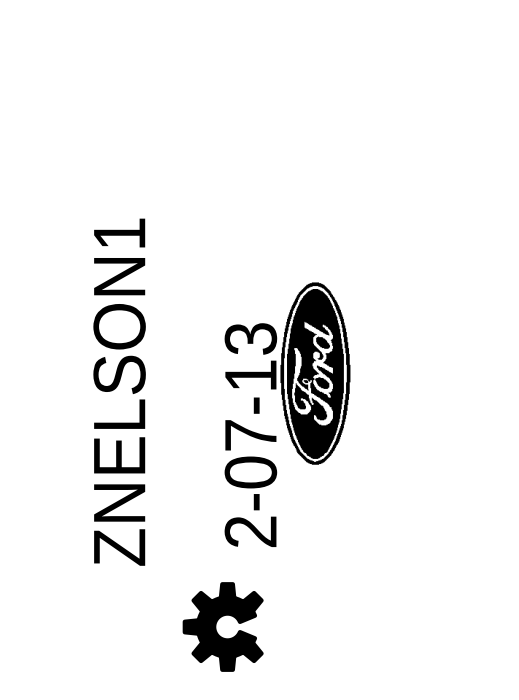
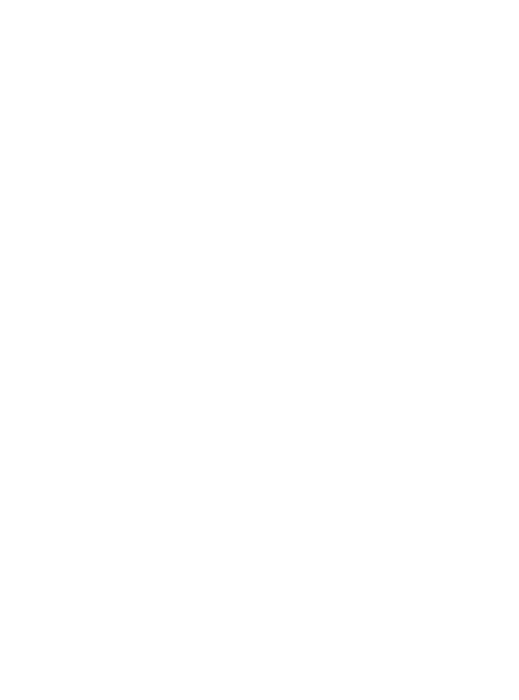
drawing: [280, 282, 351, 465] -> none
text: ZNELSON1 (119, 392) -> none
text: 2-07-13 (250, 435) -> none
drawing: [182, 582, 264, 672] -> none

